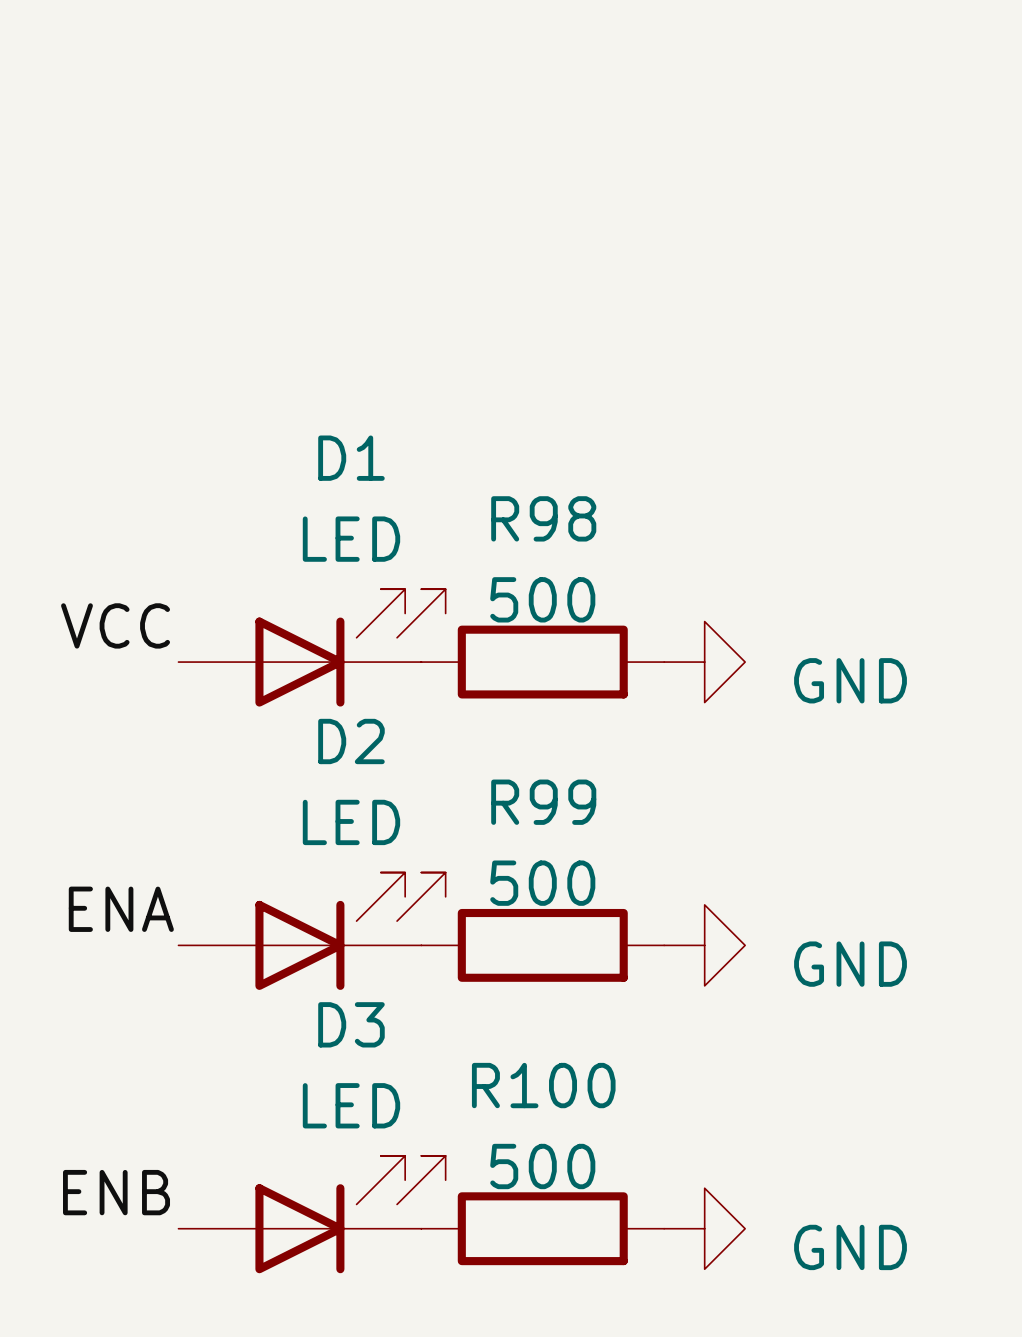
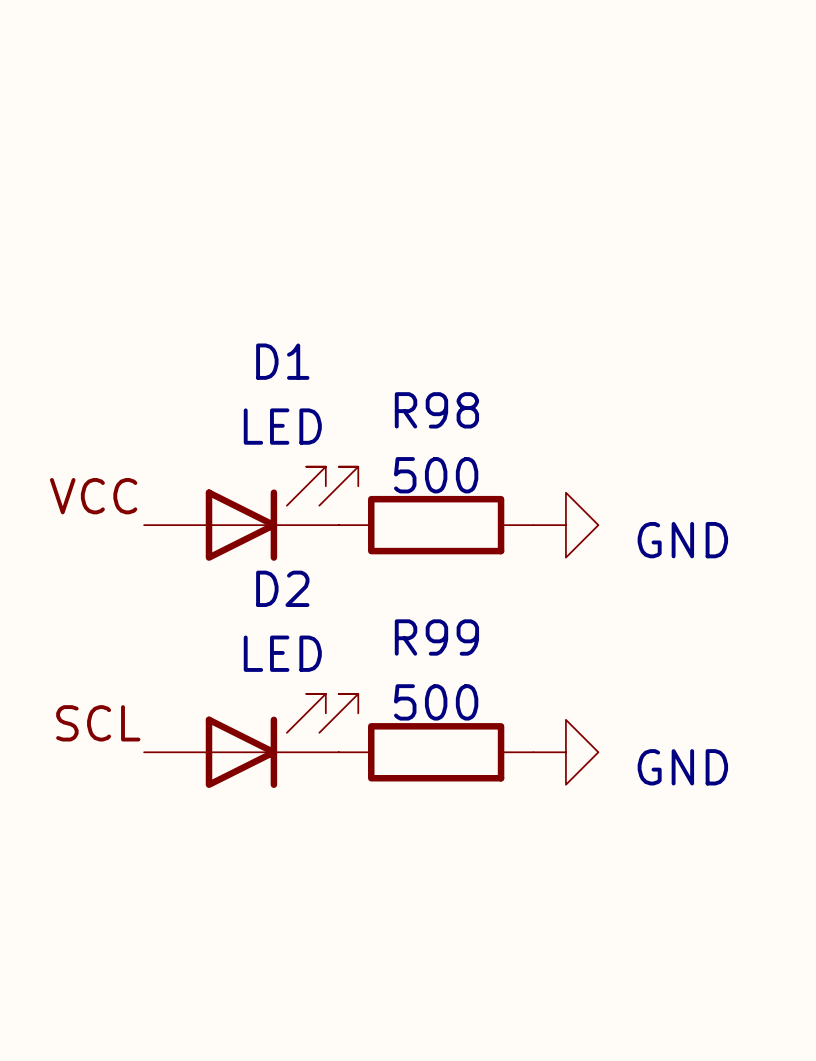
label: ENA (121, 909) -> SCL (98, 723)
label: ENB (116, 1192) -> none
D3: LED (312, 1214) -> none
R100: 500 (542, 1228) -> none
power symbol: GND (704, 1228) -> none

